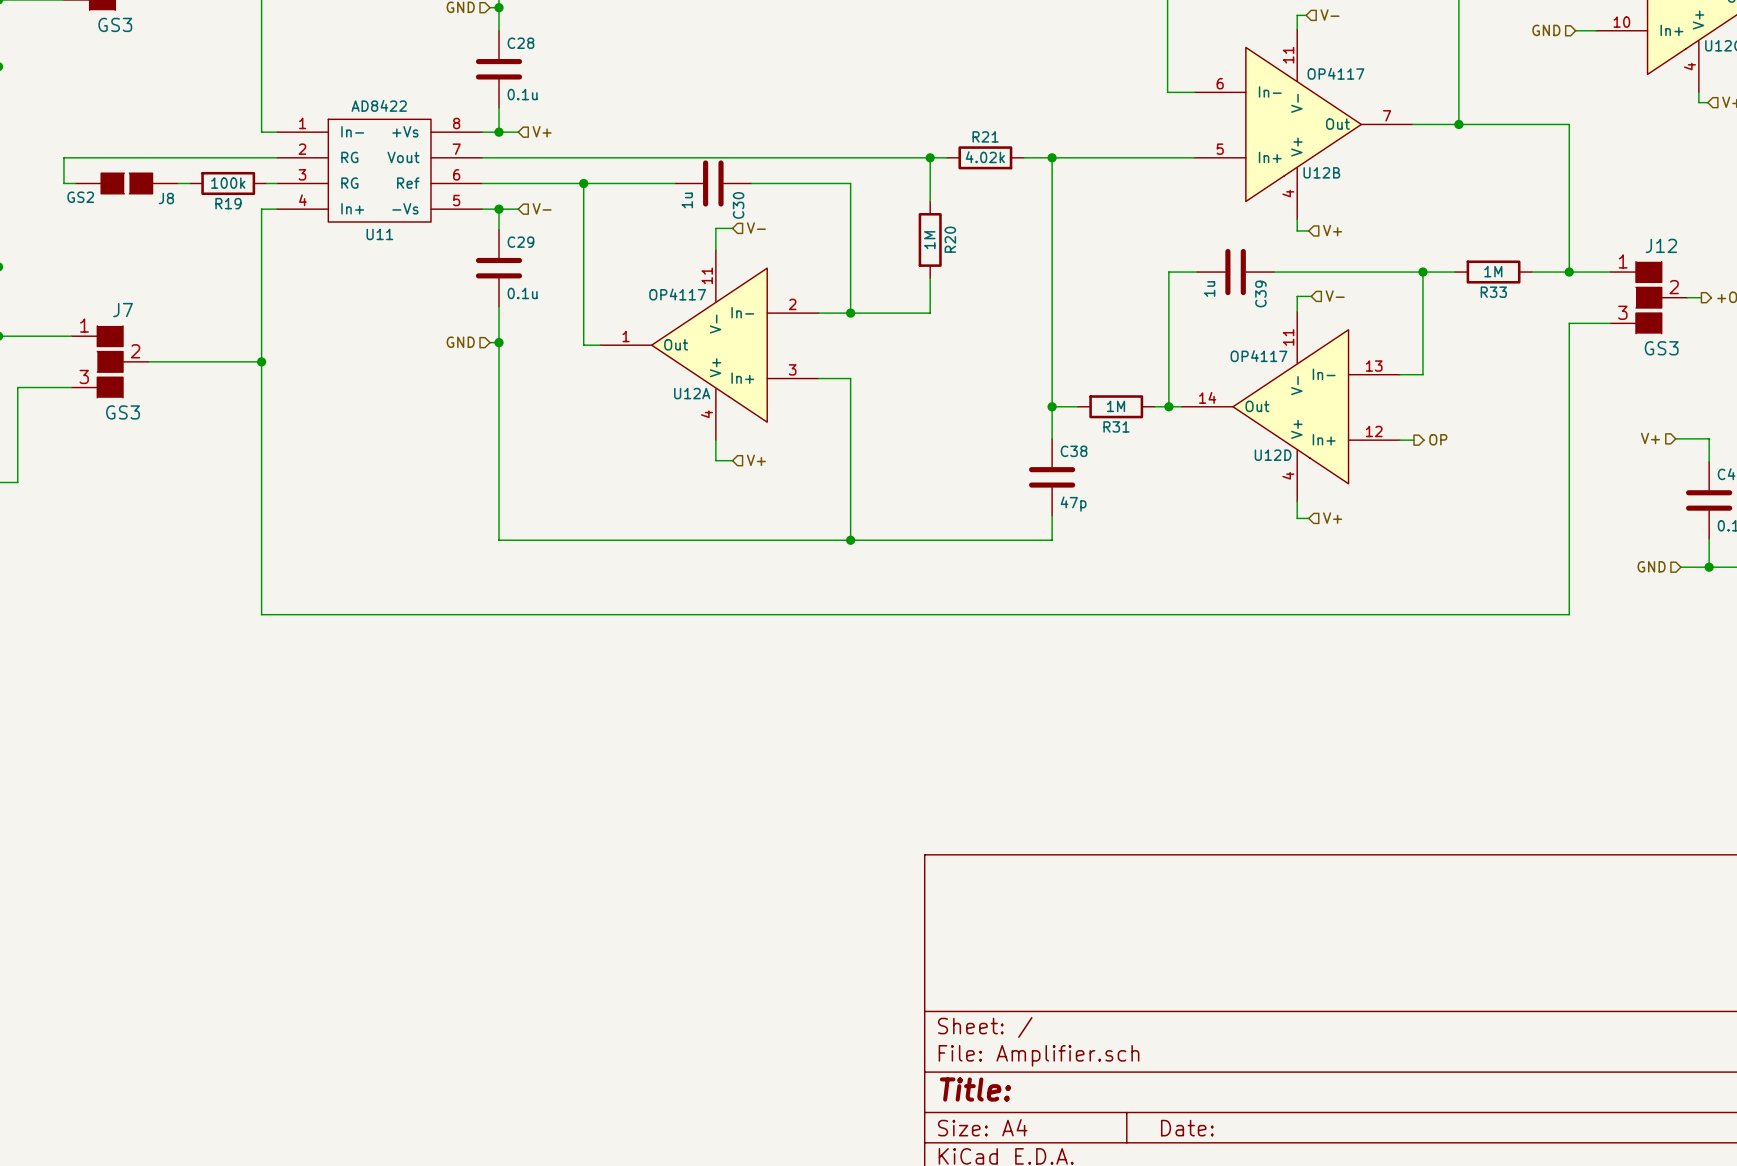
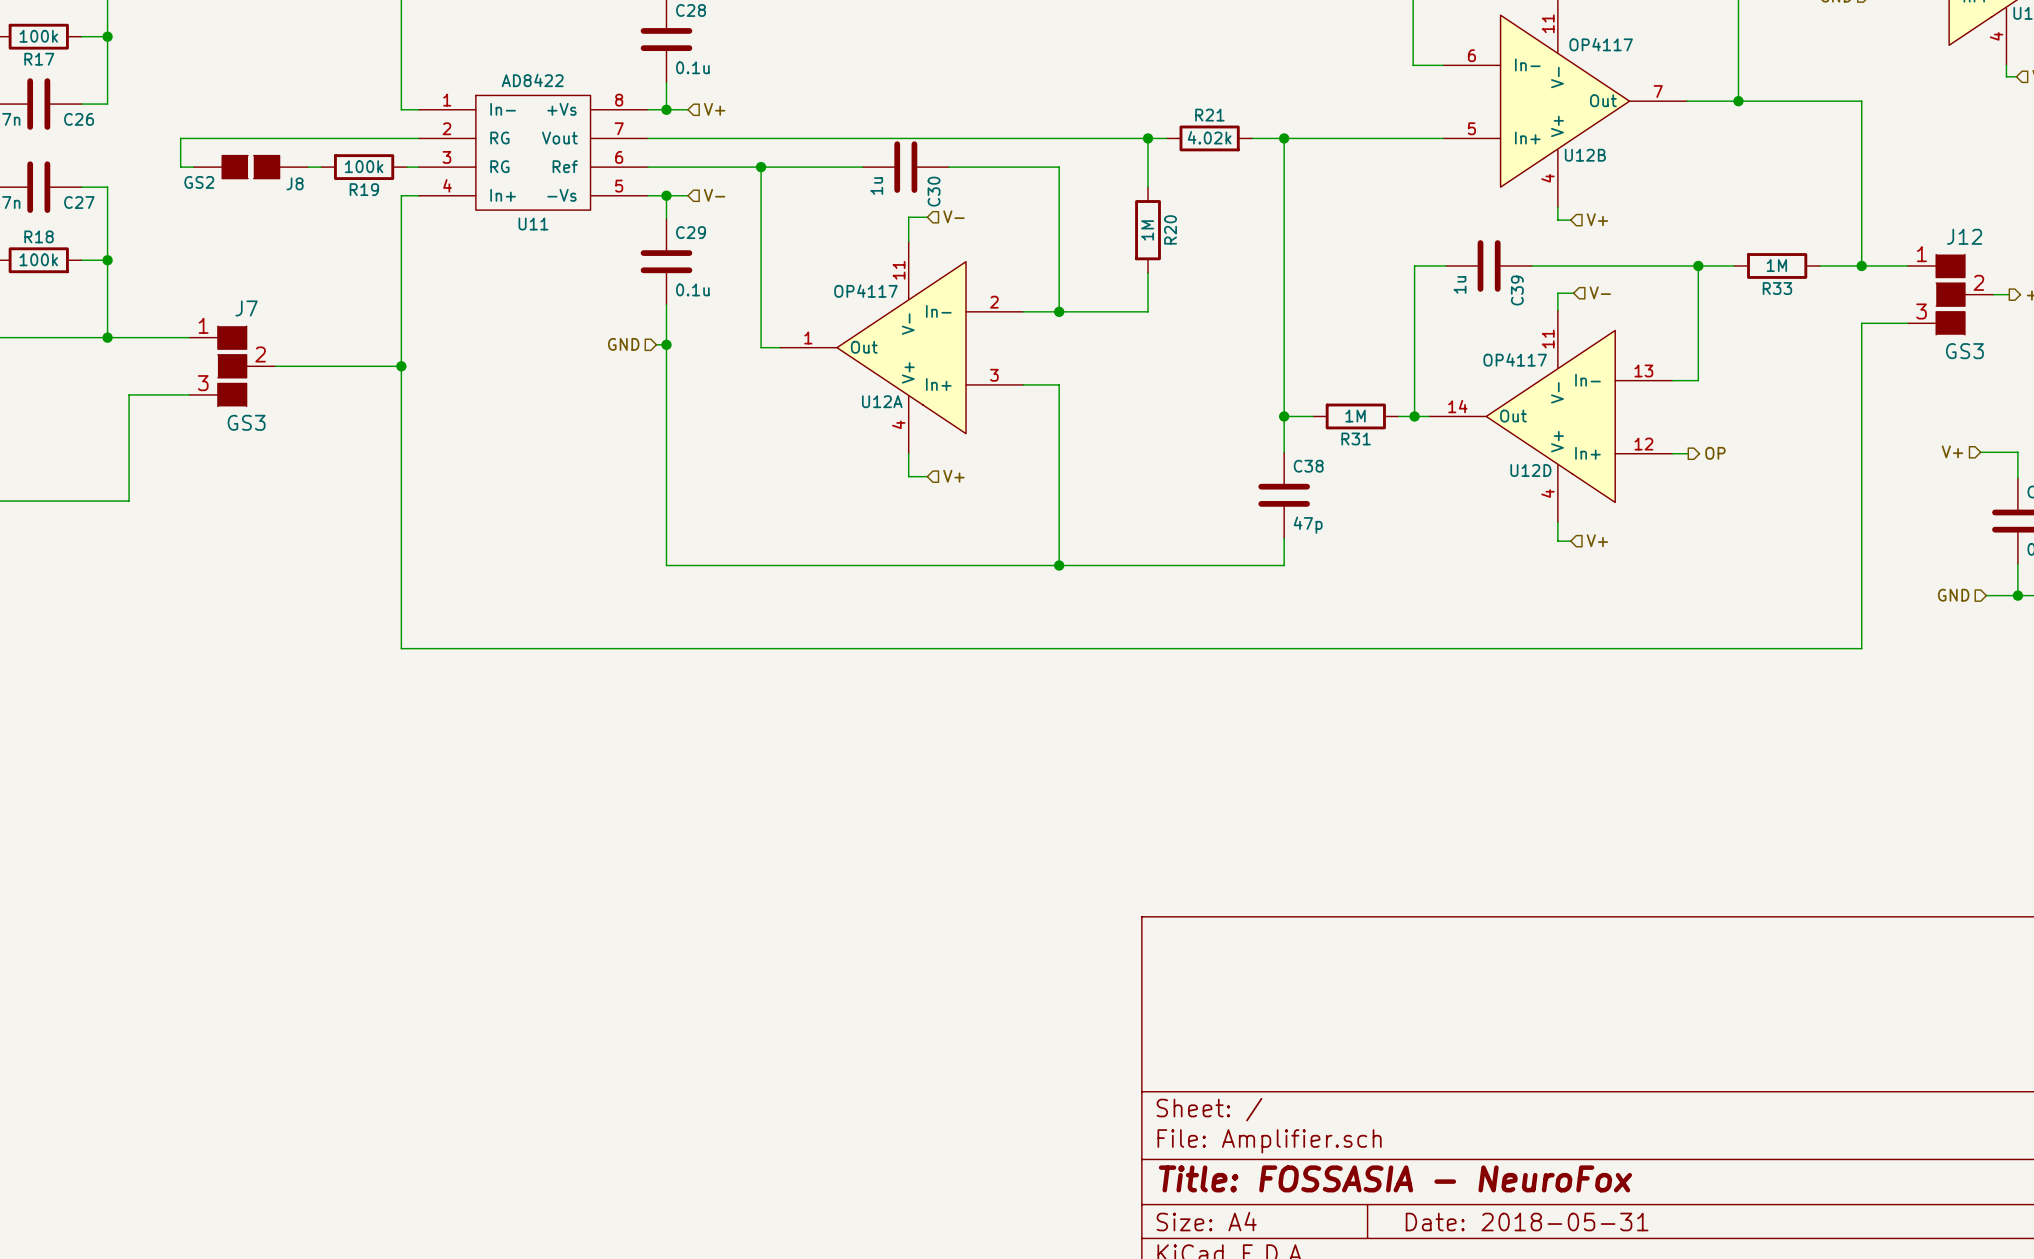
title block: Title: (975, 1089) -> Title: FOSSASIA - NeuroFox (1395, 1178)
title block: Date: (1187, 1128) -> Date: 2018-05-31 (1527, 1222)

